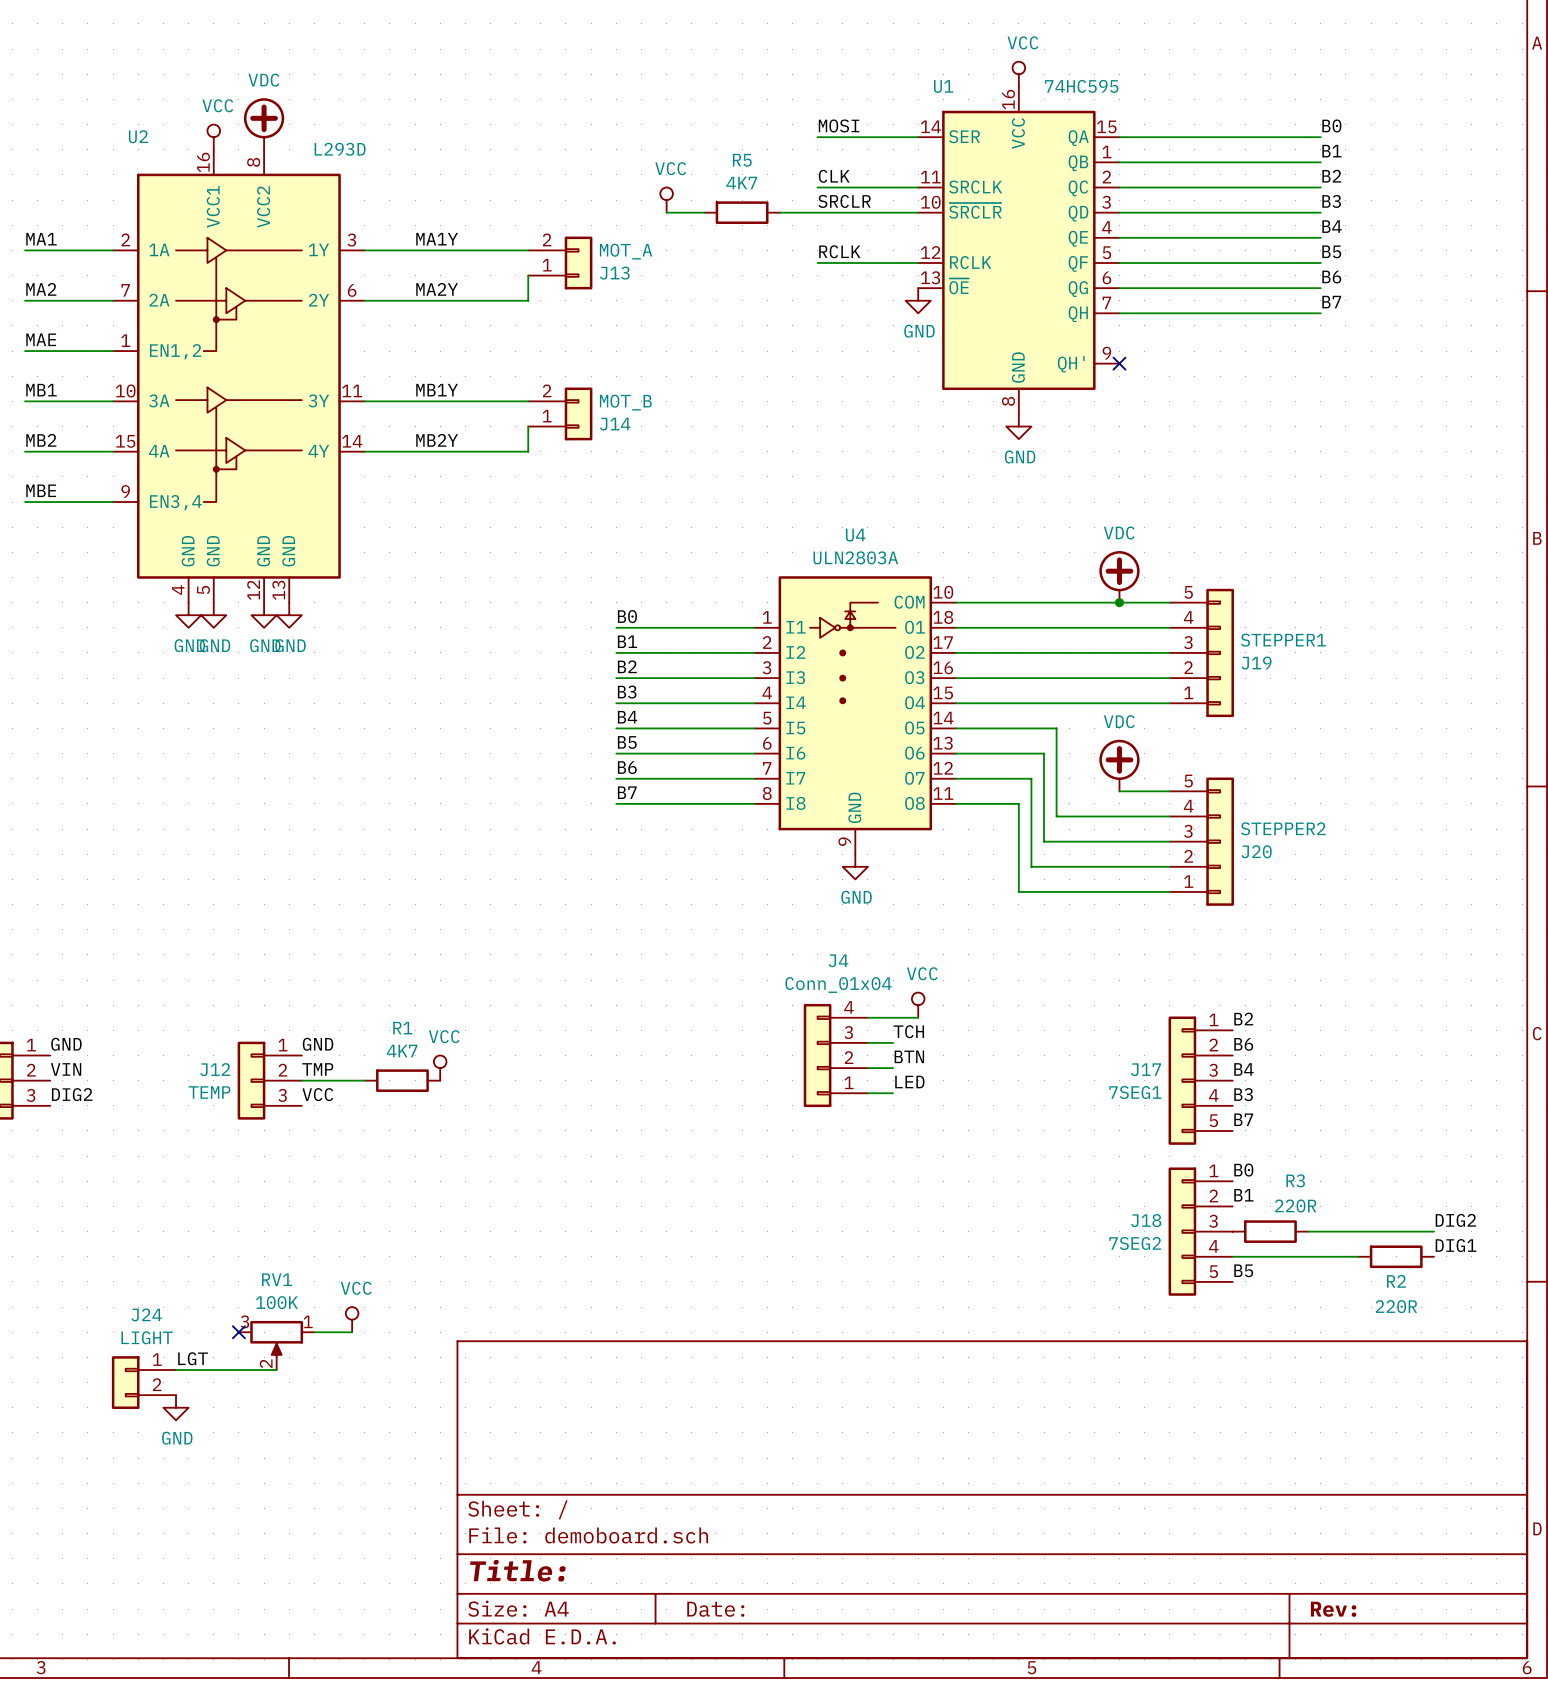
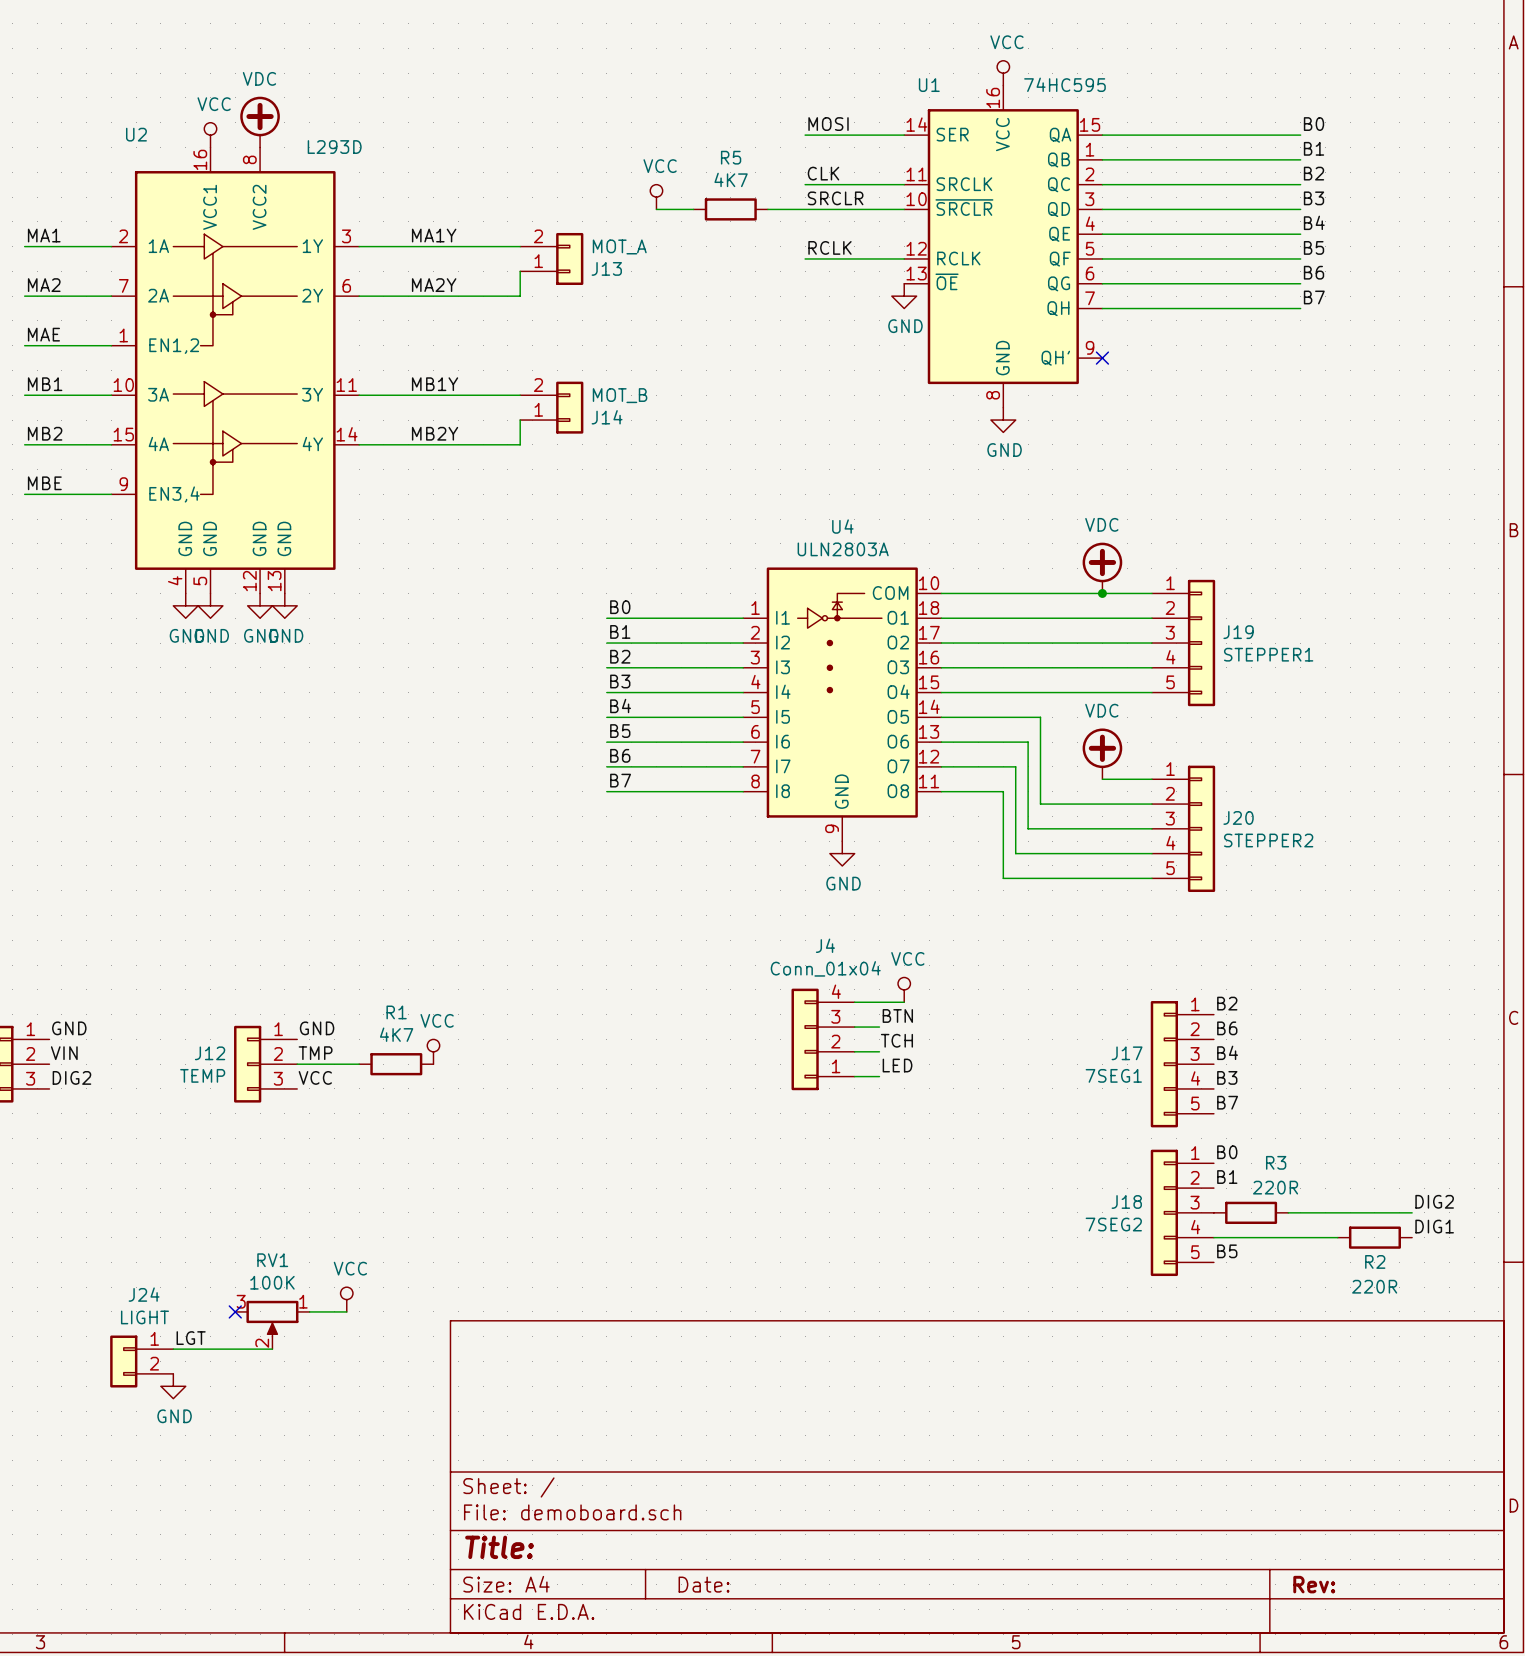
J19 flip: as is (1220, 652) -> up-down (1201, 643)
J20 flip: as is (1220, 841) -> up-down (1201, 828)
label: TCH (908, 1031) -> BTN (897, 1015)
label: BTN (909, 1056) -> TCH (896, 1040)

